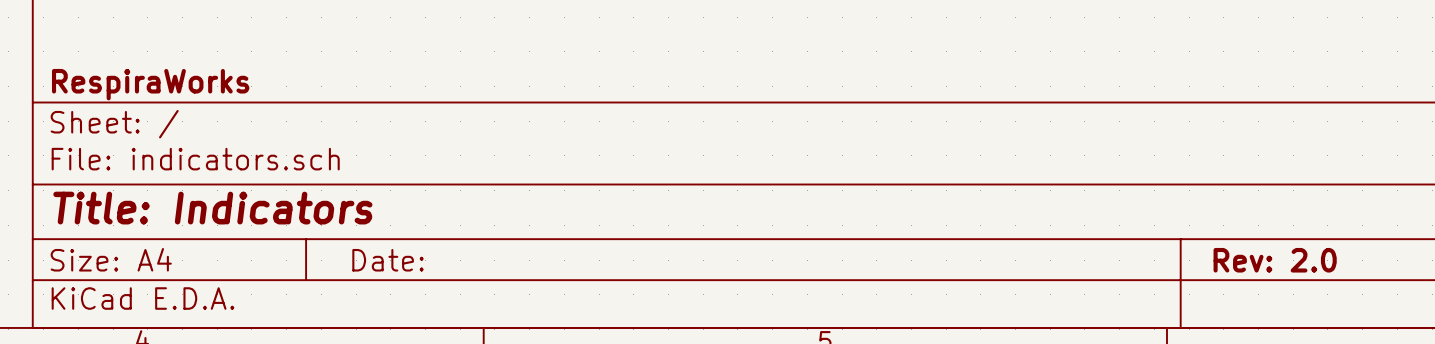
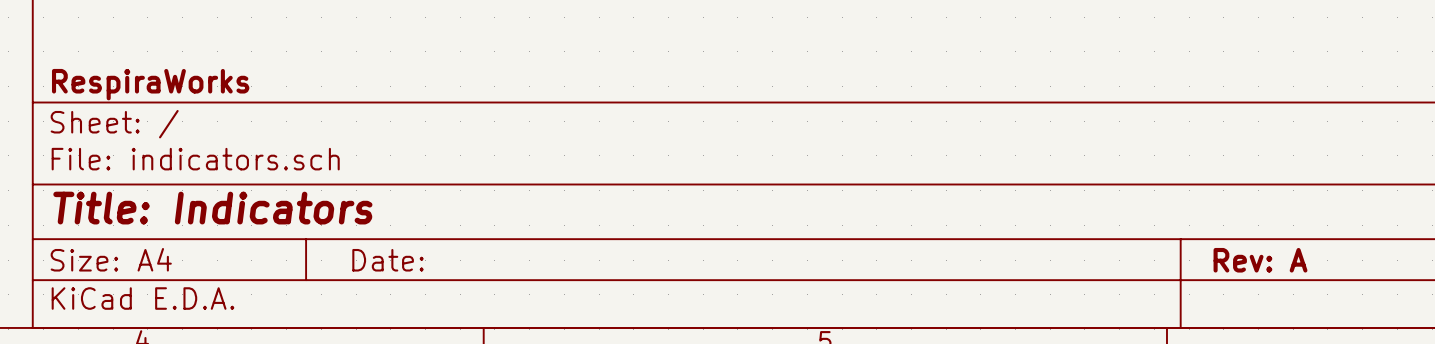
title block: Rev: 2.0 (1275, 260) -> Rev: A (1260, 260)

